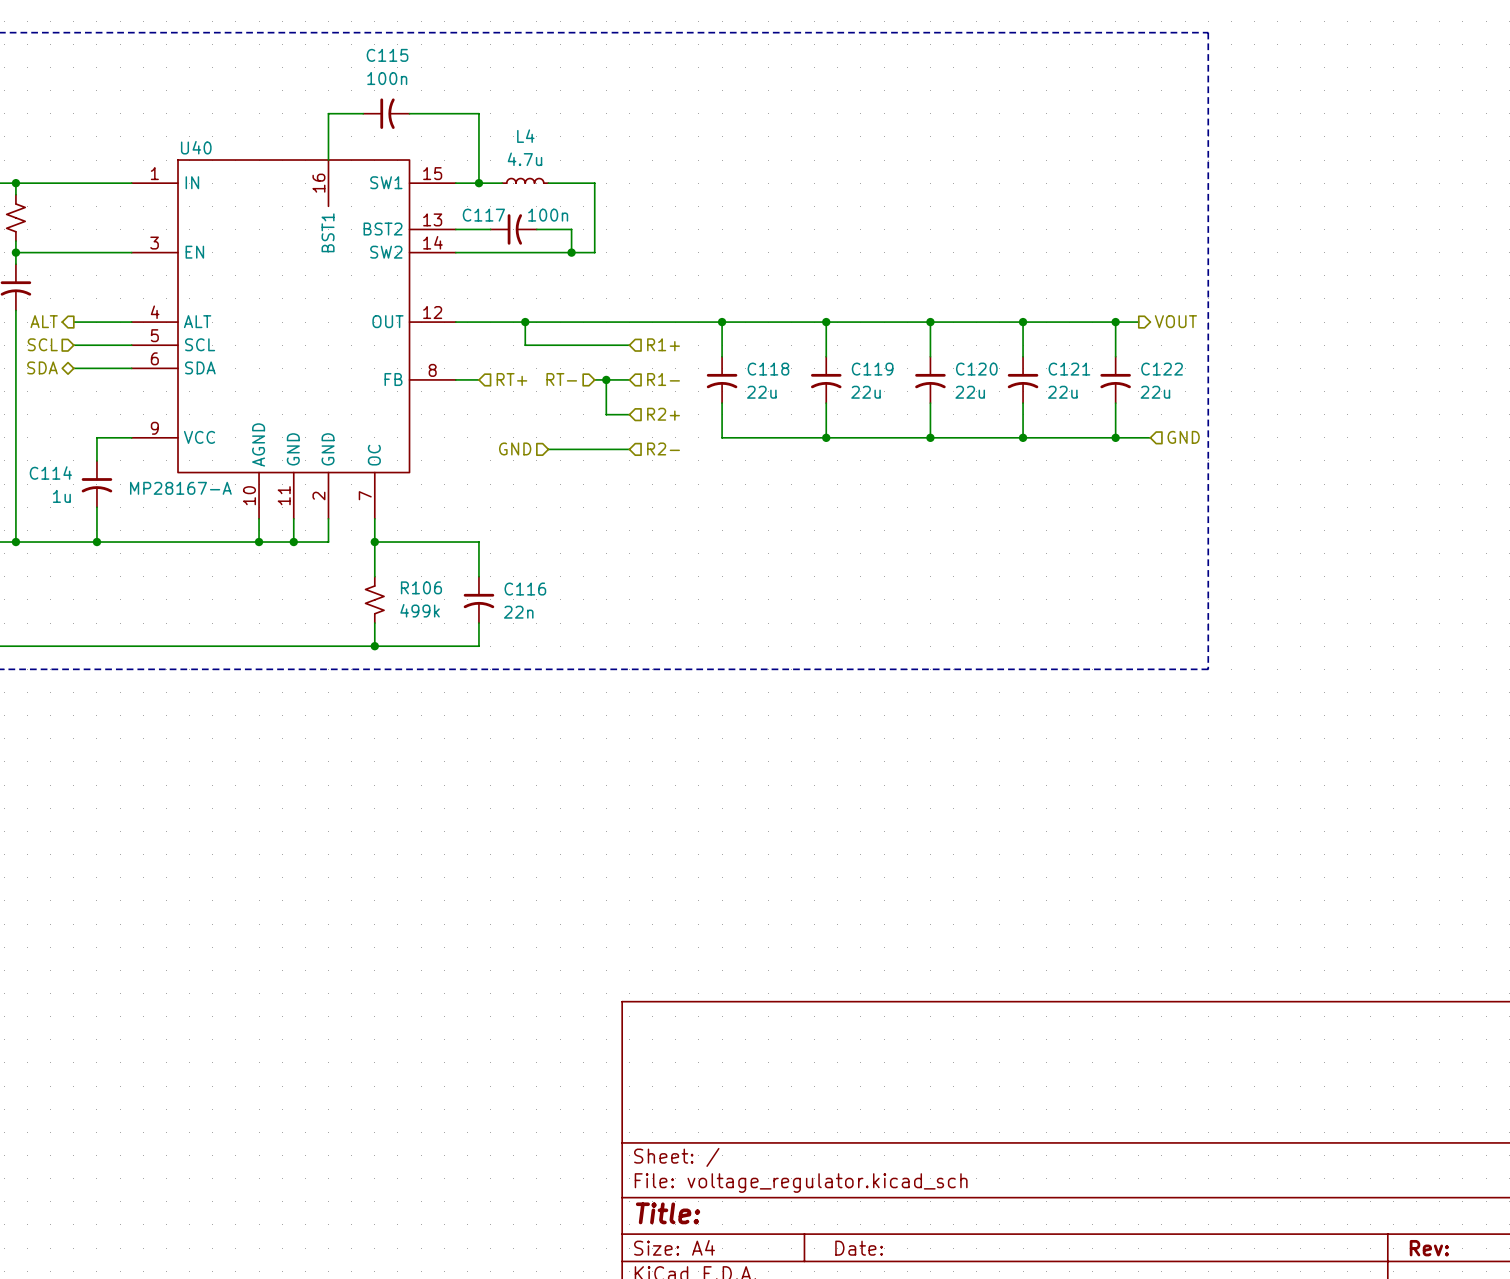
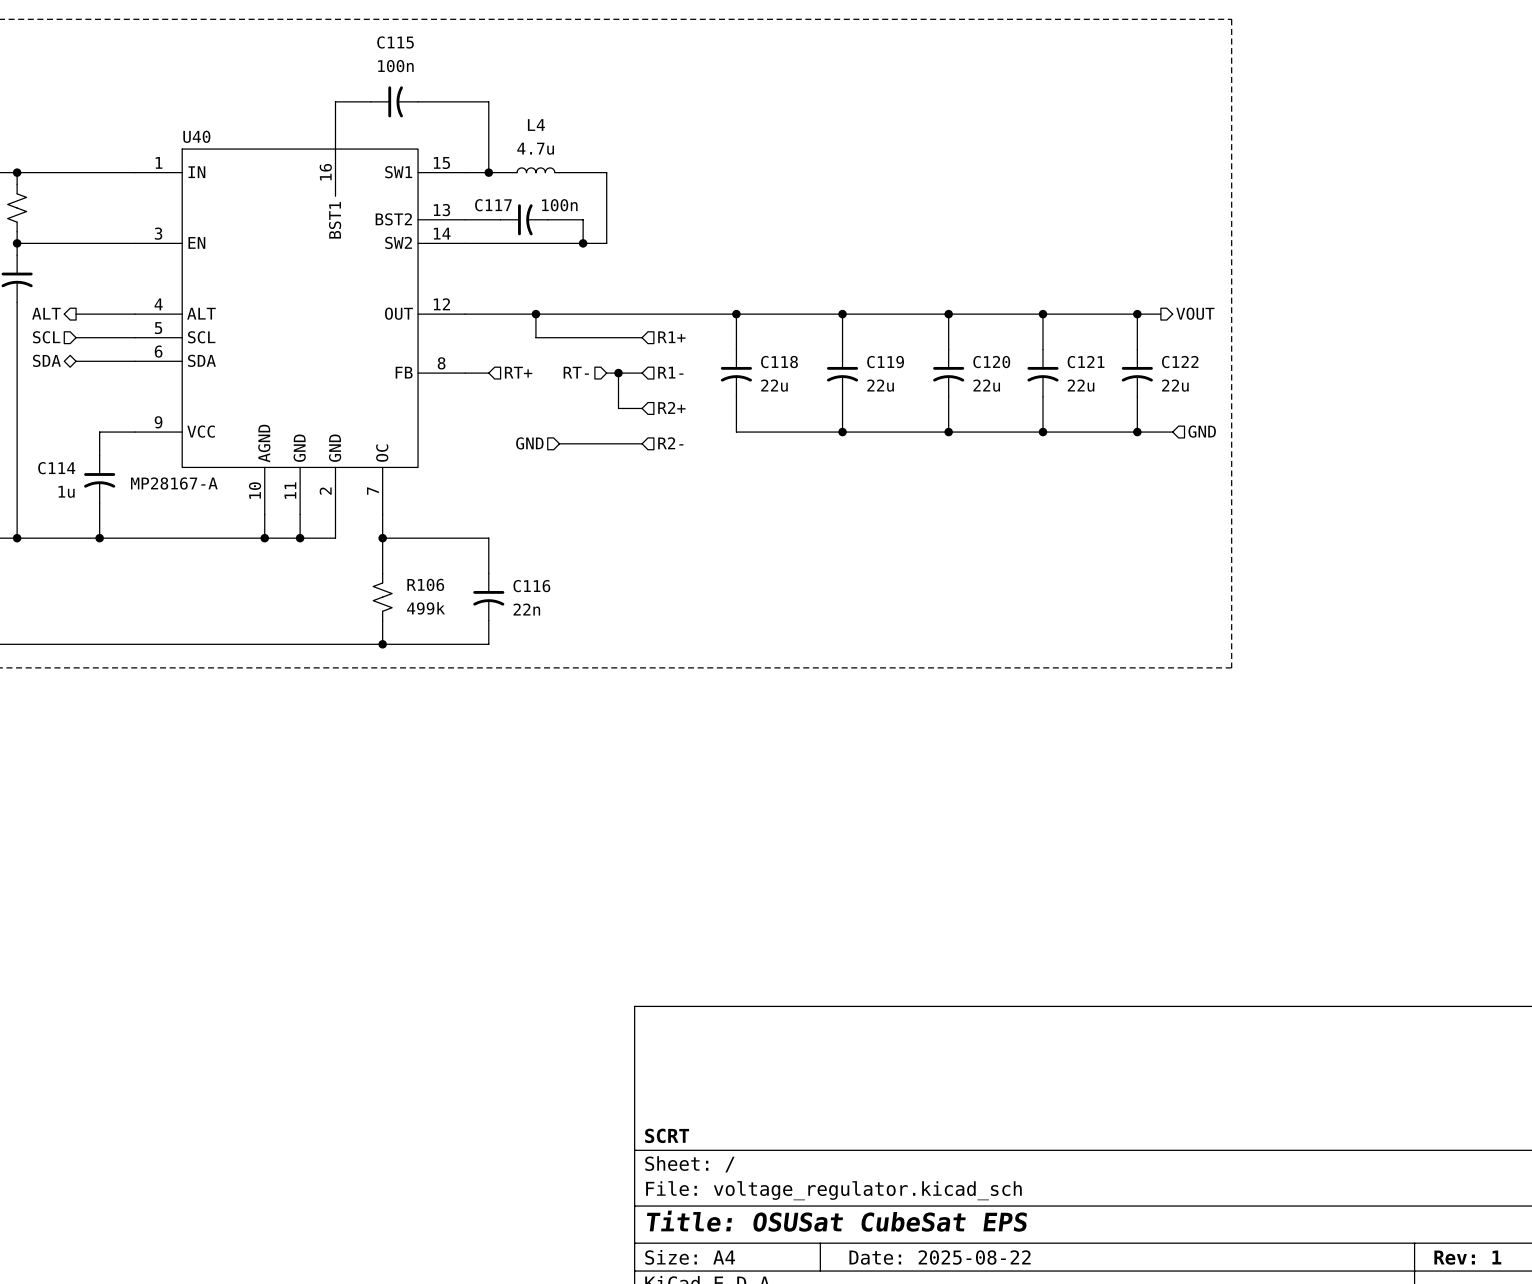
title block: none -> SCRT (667, 1135)
title block: Title: (668, 1213) -> Title: OSUSat CubeSat EPS (836, 1221)
title block: Date: (859, 1248) -> Date: 2025-08-22 (940, 1257)
title block: Rev: (1429, 1248) -> Rev: 1 (1467, 1257)

